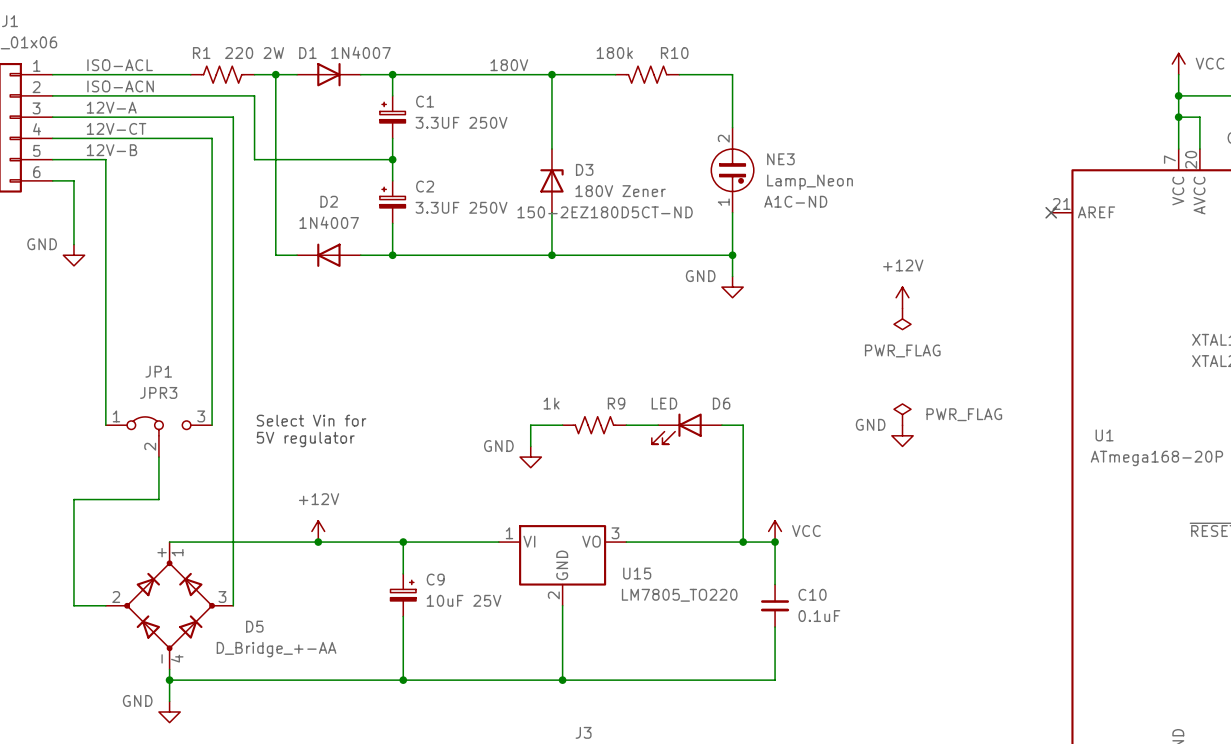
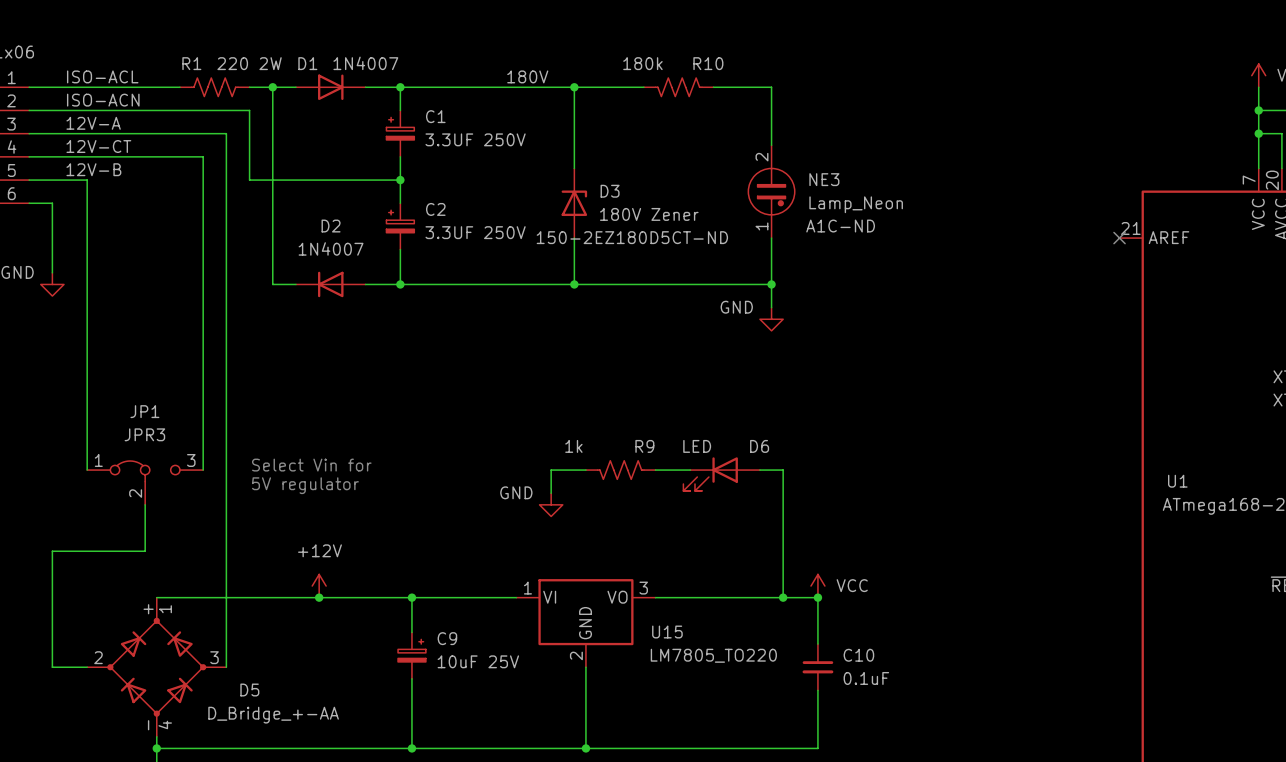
power symbol: +12V (902, 297) -> none
power symbol: PWR_FLAG (902, 318) -> none
power symbol: PWR_FLAG (902, 414) -> none
power symbol: GND (902, 435) -> none

